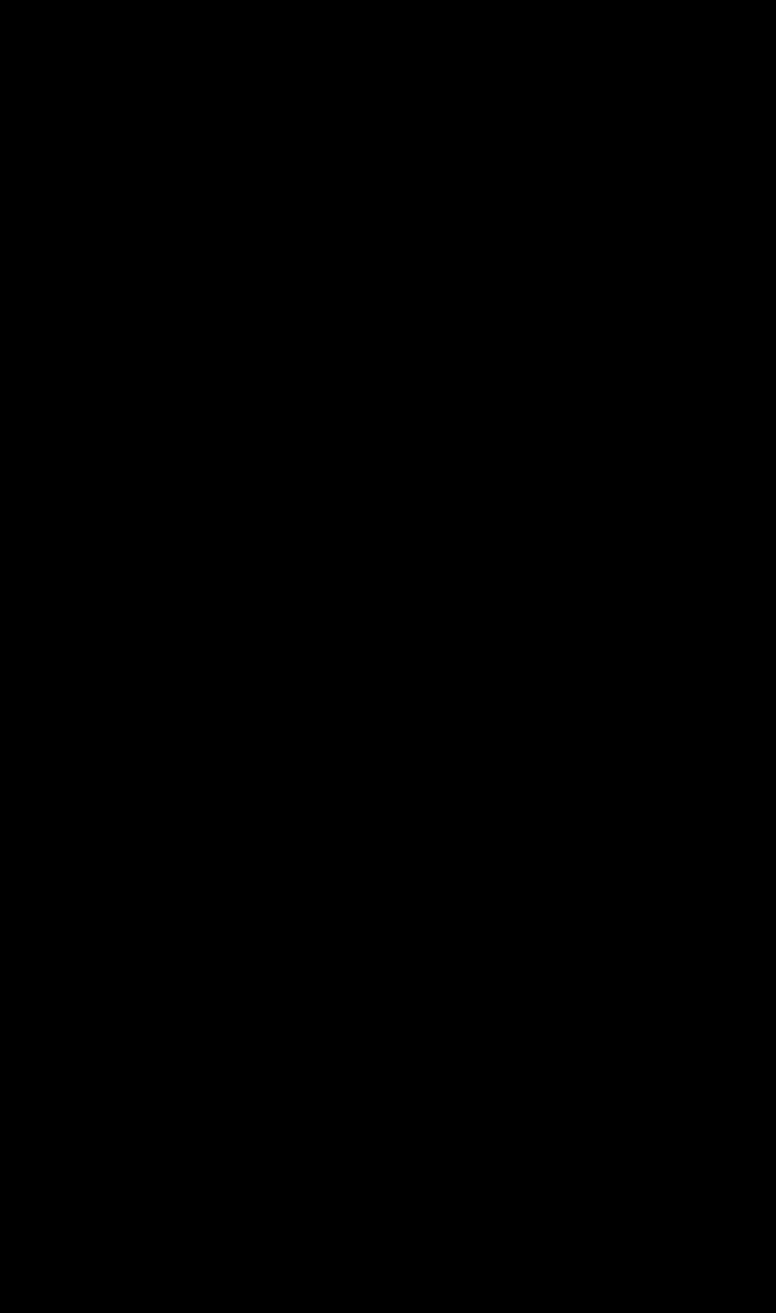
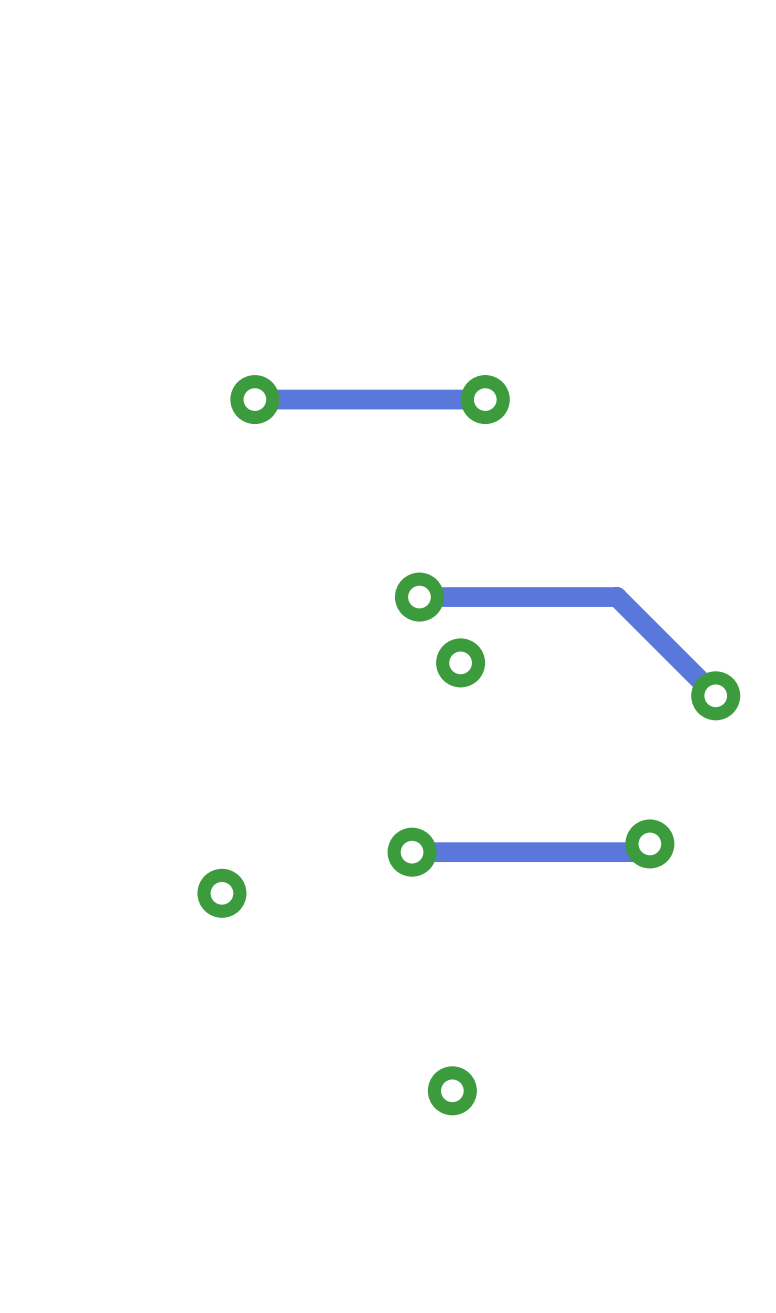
via: none -> (254, 399)
track: none -> (485, 399) (254, 399)
via: none -> (485, 399)
track: none -> (419, 597) (616, 597) (715, 695)
via: none -> (419, 597)
via: none -> (460, 662)
via: none -> (715, 695)
track: none -> (649, 843) (641, 852) (412, 852)
via: none -> (649, 843)
via: none -> (412, 852)
via: none -> (221, 893)
via: none -> (452, 1090)

